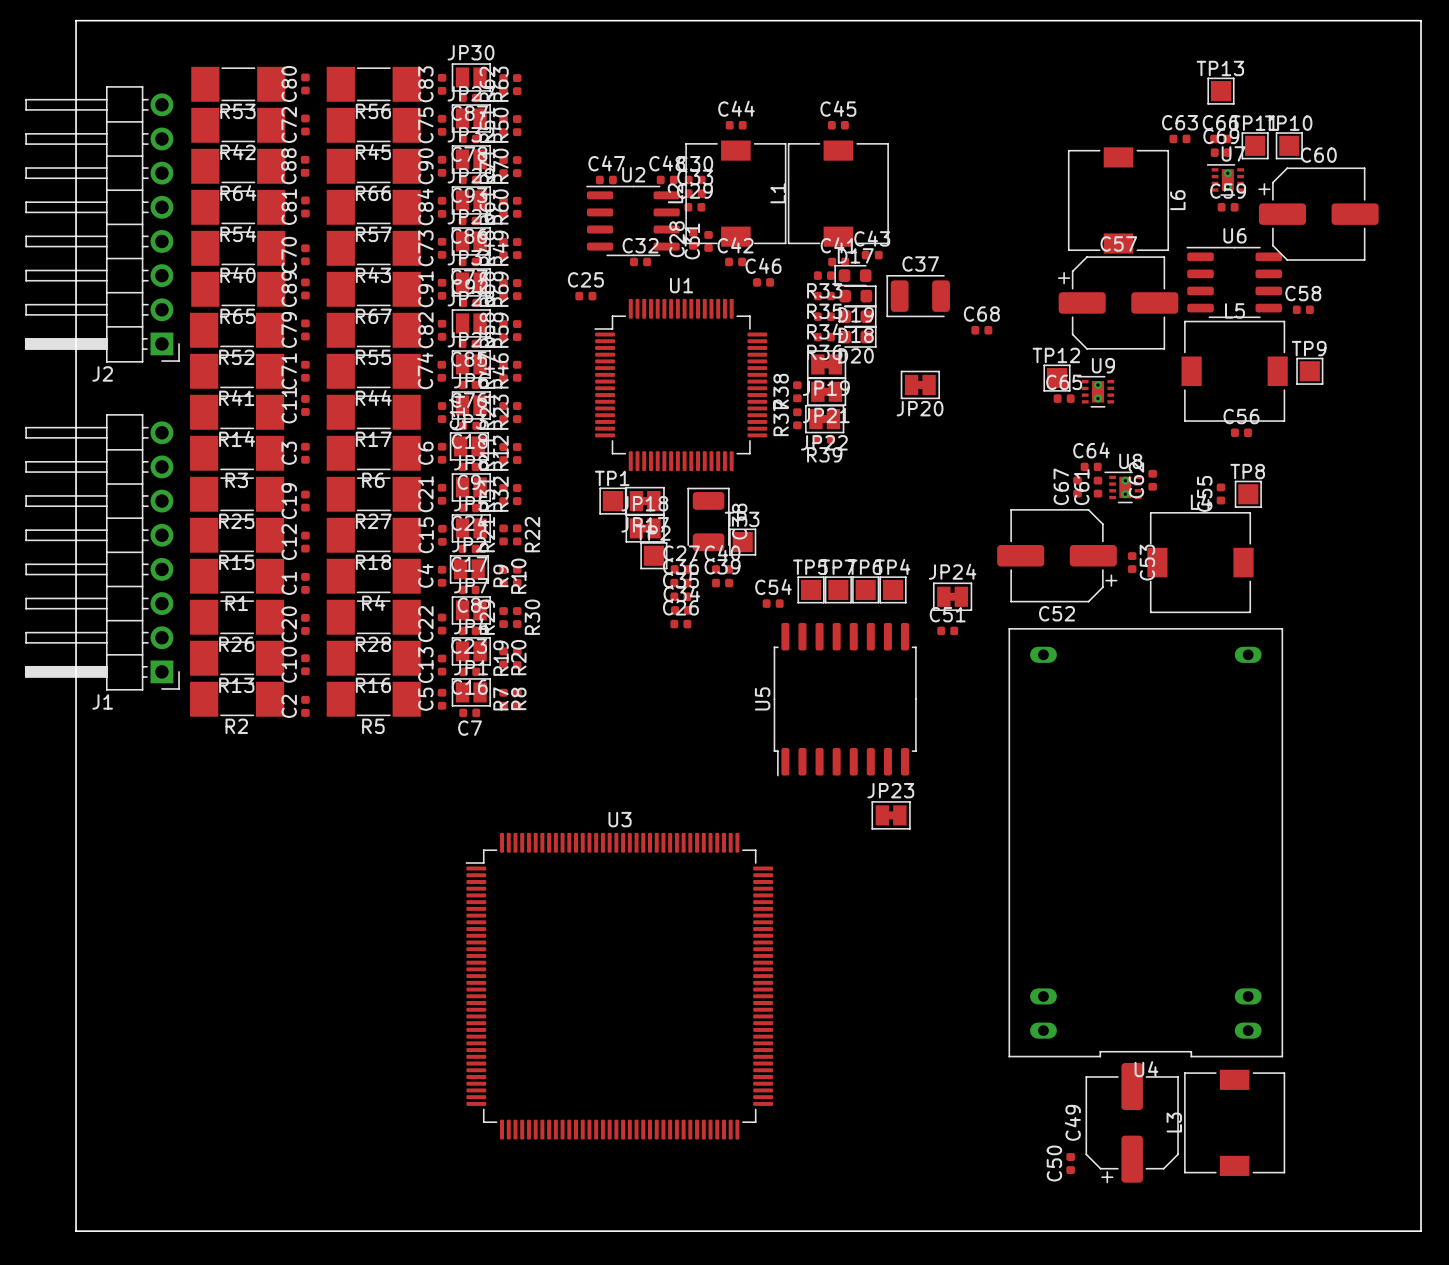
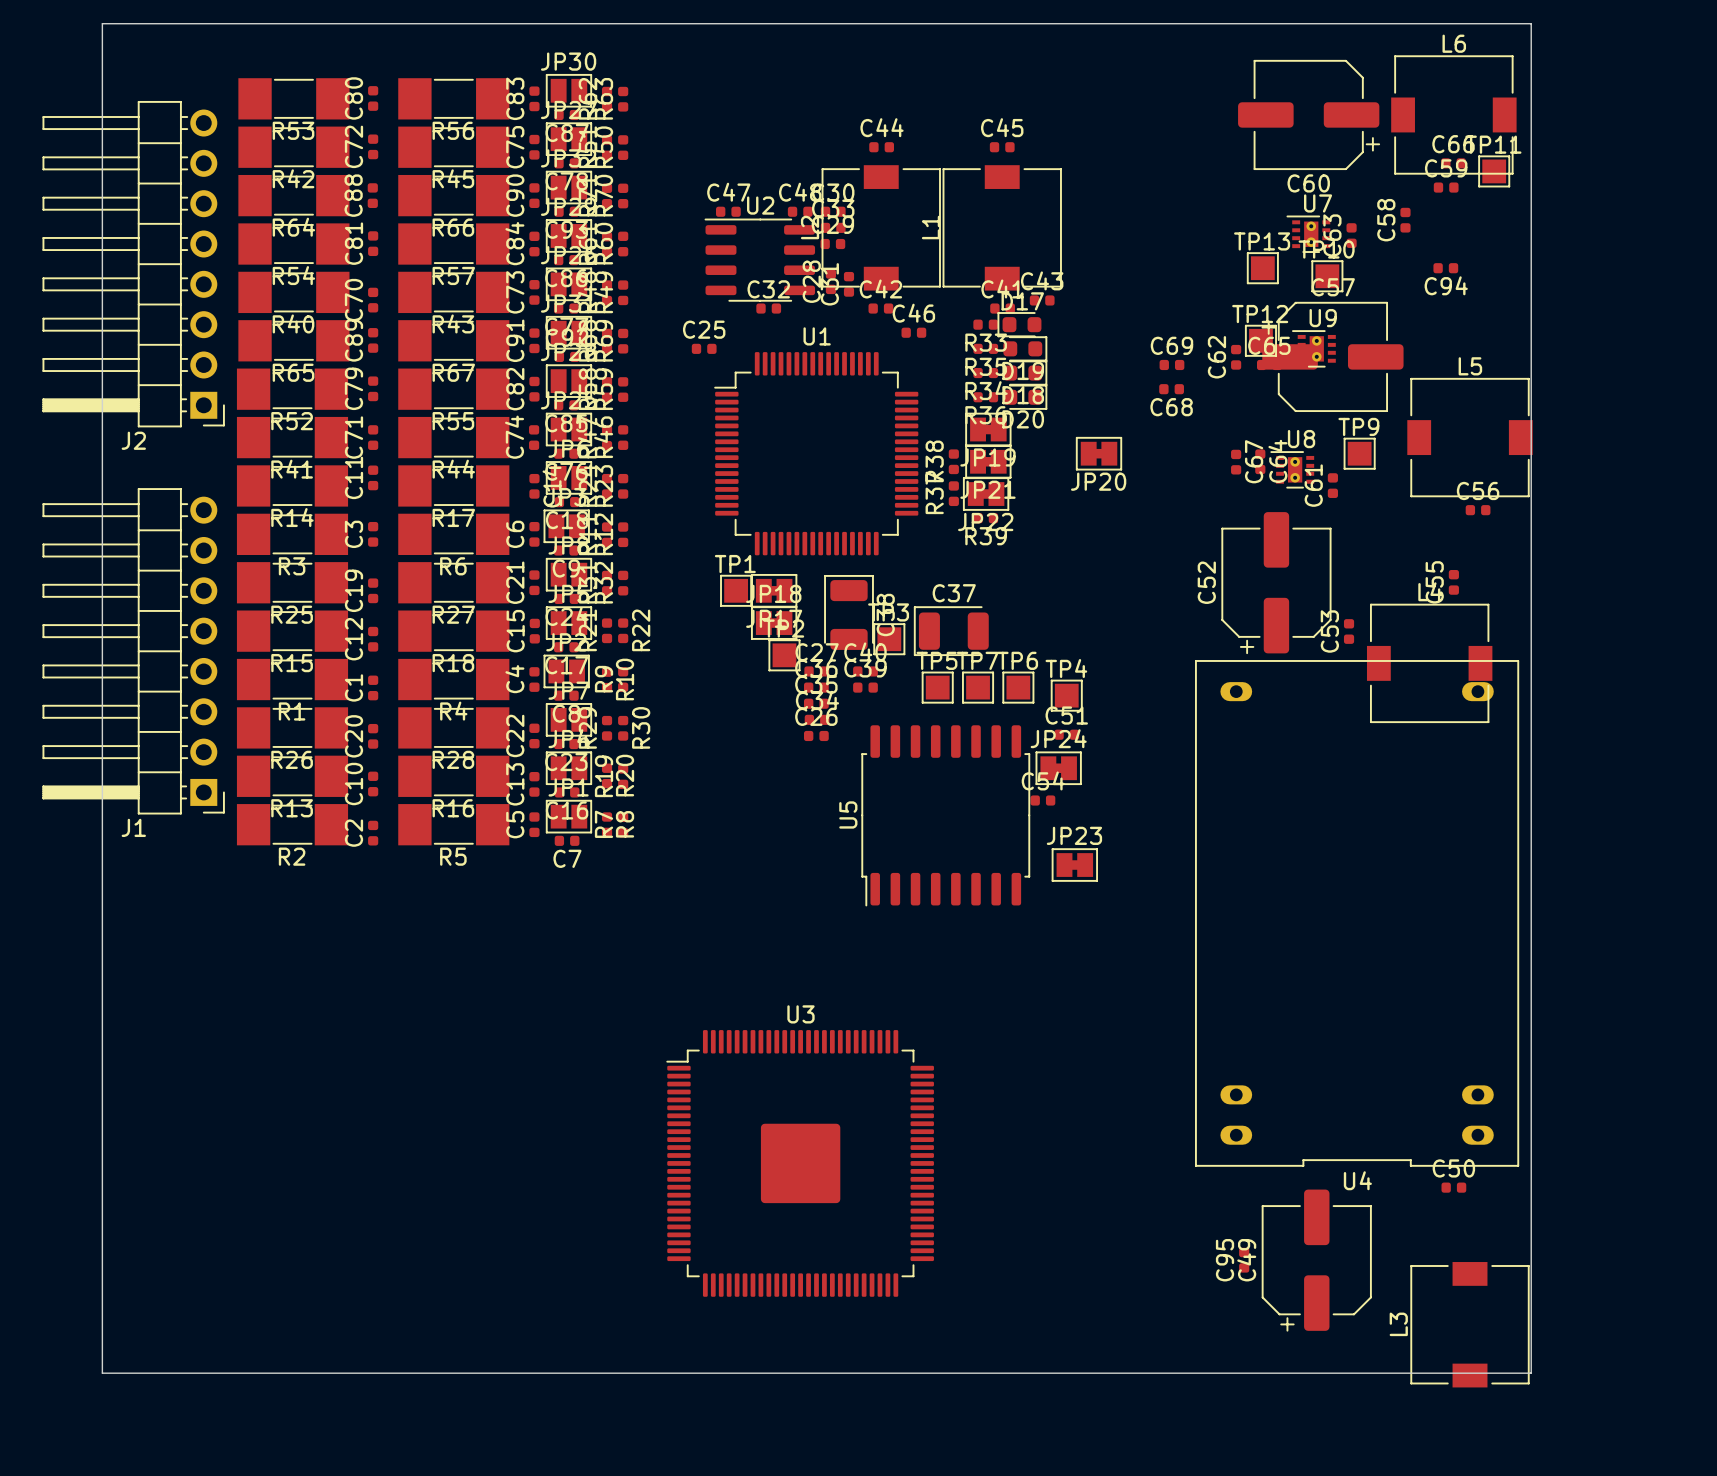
board edge: (1286, 20) (1421, 20) (1421, 1231) (76, 1231) (76, 1163) -> (1531, 23) (1531, 1373) (102, 1373)
TP13 position: (1220, 91) -> (1262, 268)
C63 rotation: 0° (1179, 138) -> 90° clockwise (1351, 235)
C63 position: (1179, 138) -> (1351, 235)
TP10 position: (1289, 145) -> (1327, 276)
C69 position: (1221, 152) -> (1171, 364)
U7 position: (1225, 179) -> (1308, 234)
L6 rotation: 0° (1118, 200) -> 90° clockwise (1453, 114)
L6 position: (1118, 200) -> (1453, 114)
L6 name position: L6 (1177, 200) -> L6 (1454, 43)
C59 position: (1228, 207) -> (1446, 187)
C60 rotation: 0° (1318, 214) -> 180° (1309, 114)
C60 position: (1318, 214) -> (1309, 114)
C94: none -> (1445, 268)
U6: (1234, 282) -> none
C37 position: (918, 296) -> (951, 631)
C58 rotation: 0° (1303, 309) -> 90° clockwise (1405, 220)
C58 position: (1303, 309) -> (1405, 220)
C68 name position: C68 (981, 314) -> C68 (1171, 407)
TP9 position: (1309, 371) -> (1359, 453)
TP12 position: (1057, 378) -> (1260, 340)
U9 position: (1095, 391) -> (1313, 348)
C65 position: (1064, 398) -> (1269, 364)
C64 rotation: 0° (1091, 466) -> 90° clockwise (1260, 461)
C64 position: (1091, 466) -> (1260, 461)
C62 position: (1152, 480) -> (1236, 357)
C67 name position: C67 (1061, 486) -> C67 (1254, 461)
C67 position: (1077, 487) -> (1236, 462)
C61 position: (1097, 487) -> (1332, 485)
U8 position: (1122, 487) -> (1292, 469)
TP8: (1248, 494) -> none
C52 footprint: [997, 509, 1118, 603] -> [1221, 512, 1332, 655]
C53 position: (1132, 562) -> (1349, 631)
C53 name position: C53 (1147, 562) -> C53 (1329, 631)
TP5 position: (811, 589) -> (937, 687)
TP7 position: (838, 589) -> (978, 687)
TP6 position: (865, 589) -> (1018, 687)
JP24 position: (952, 596) -> (1058, 768)
C54 position: (773, 603) -> (1042, 800)
C52 name position: C52 (1057, 613) -> C52 (1206, 582)
C51 position: (947, 630) -> (1066, 734)
U5 position: (845, 699) -> (945, 815)
JP23 position: (891, 815) -> (1074, 865)
U3 name position: U3 (620, 819) -> U3 (800, 1014)
U3 footprint: [465, 832, 774, 1140] -> [666, 1030, 934, 1297]
U4 position: (1145, 842) -> (1357, 913)
C95: none -> (1244, 1260)
C49 position: (1132, 1123) -> (1316, 1260)
C50 rotation: 0° (1070, 1163) -> 90° clockwise (1453, 1187)
C50 position: (1070, 1163) -> (1453, 1187)

